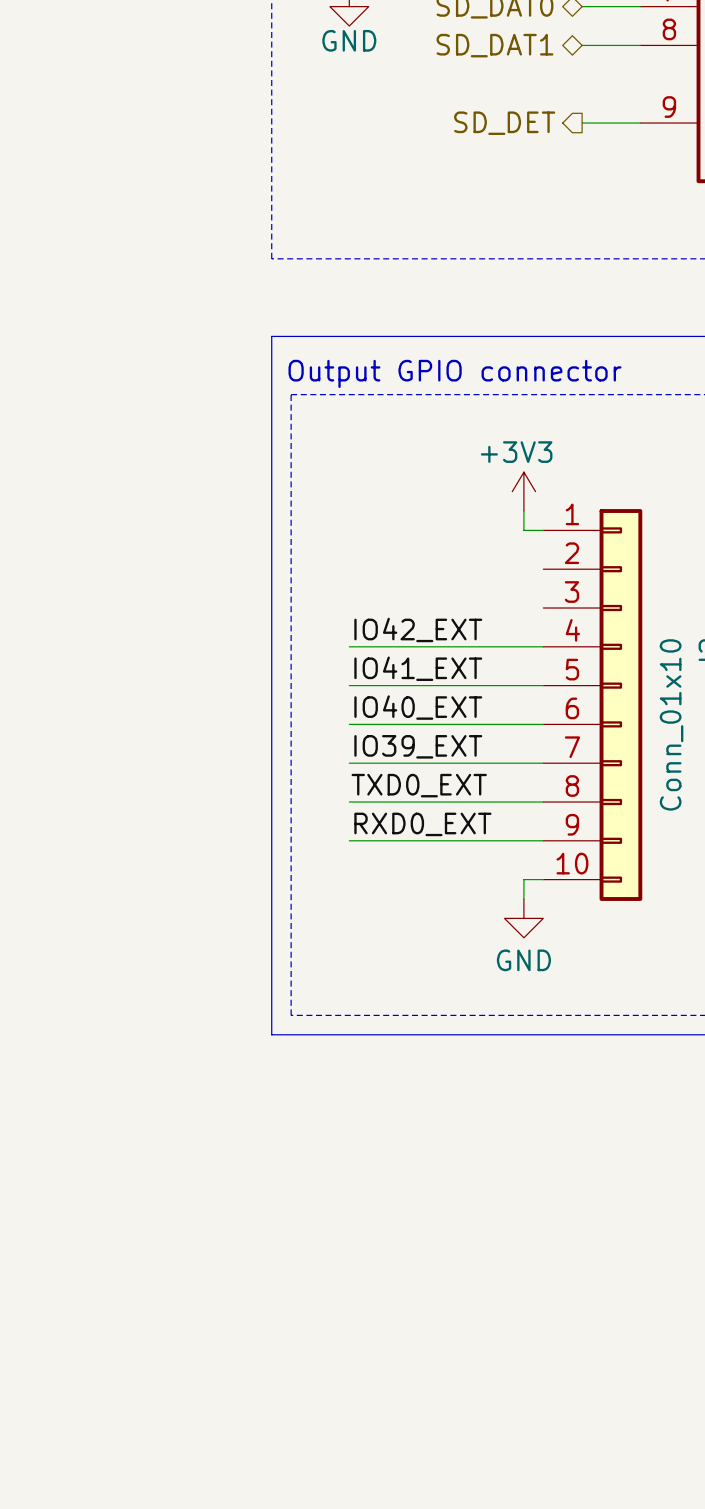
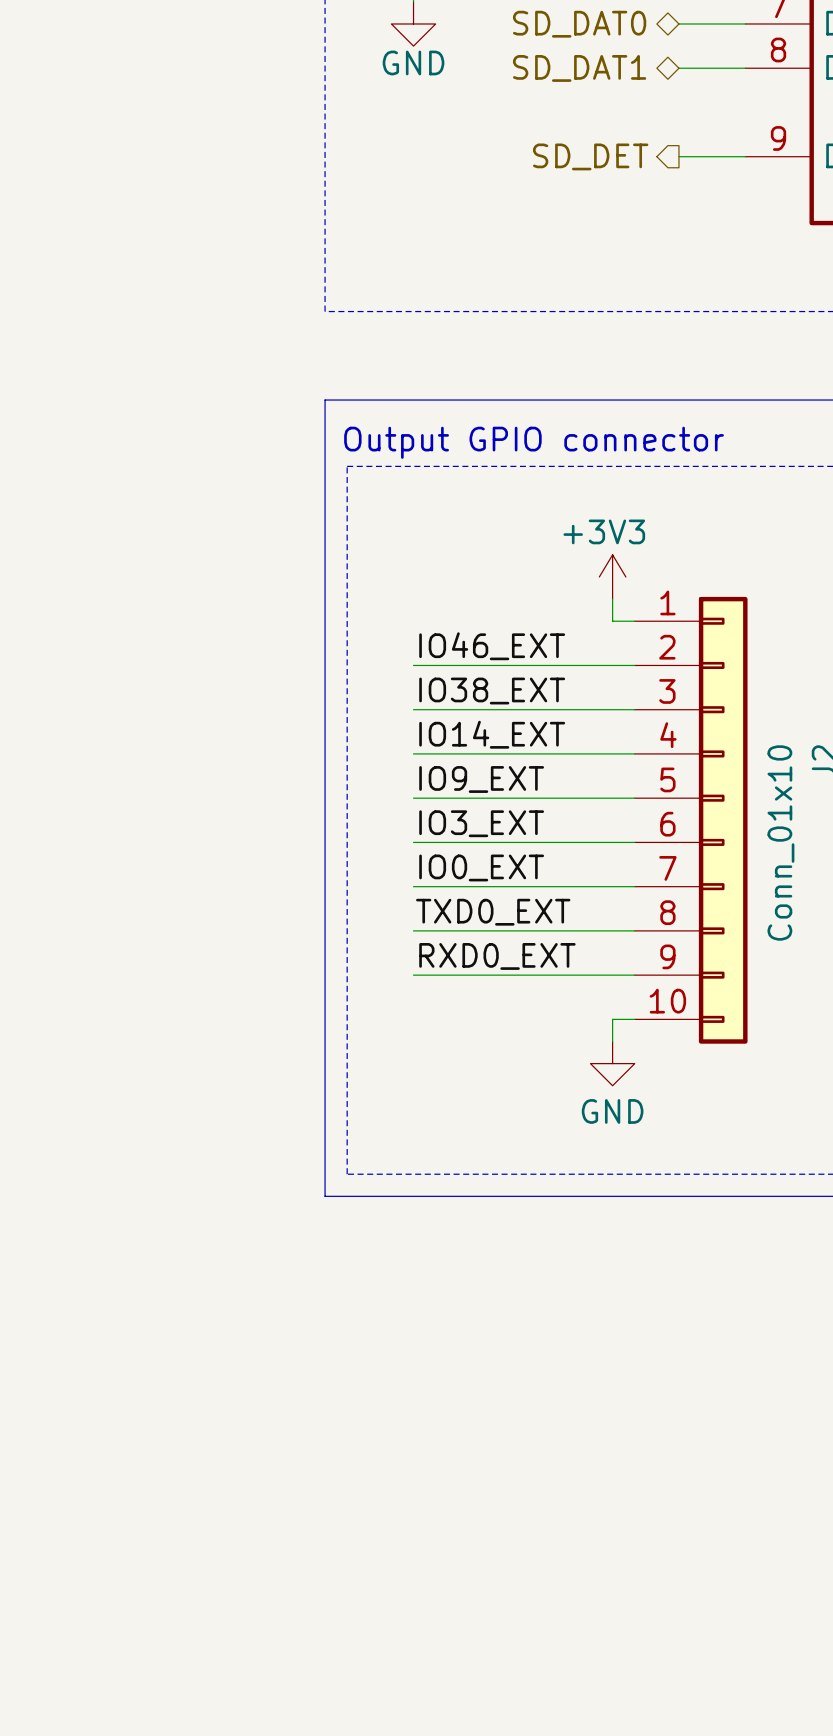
label: none -> IO46_EXT (492, 646)
wire: none -> (413, 665) (634, 665)
label: none -> IO38_EXT (492, 691)
wire: none -> (413, 709) (634, 709)
label: IO42_EXT (418, 629) -> IO14_EXT (492, 734)
label: IO41_EXT (418, 668) -> IO9_EXT (481, 779)
label: IO40_EXT (418, 707) -> IO3_EXT (481, 823)
label: IO39_EXT (418, 746) -> IO0_EXT (481, 867)

